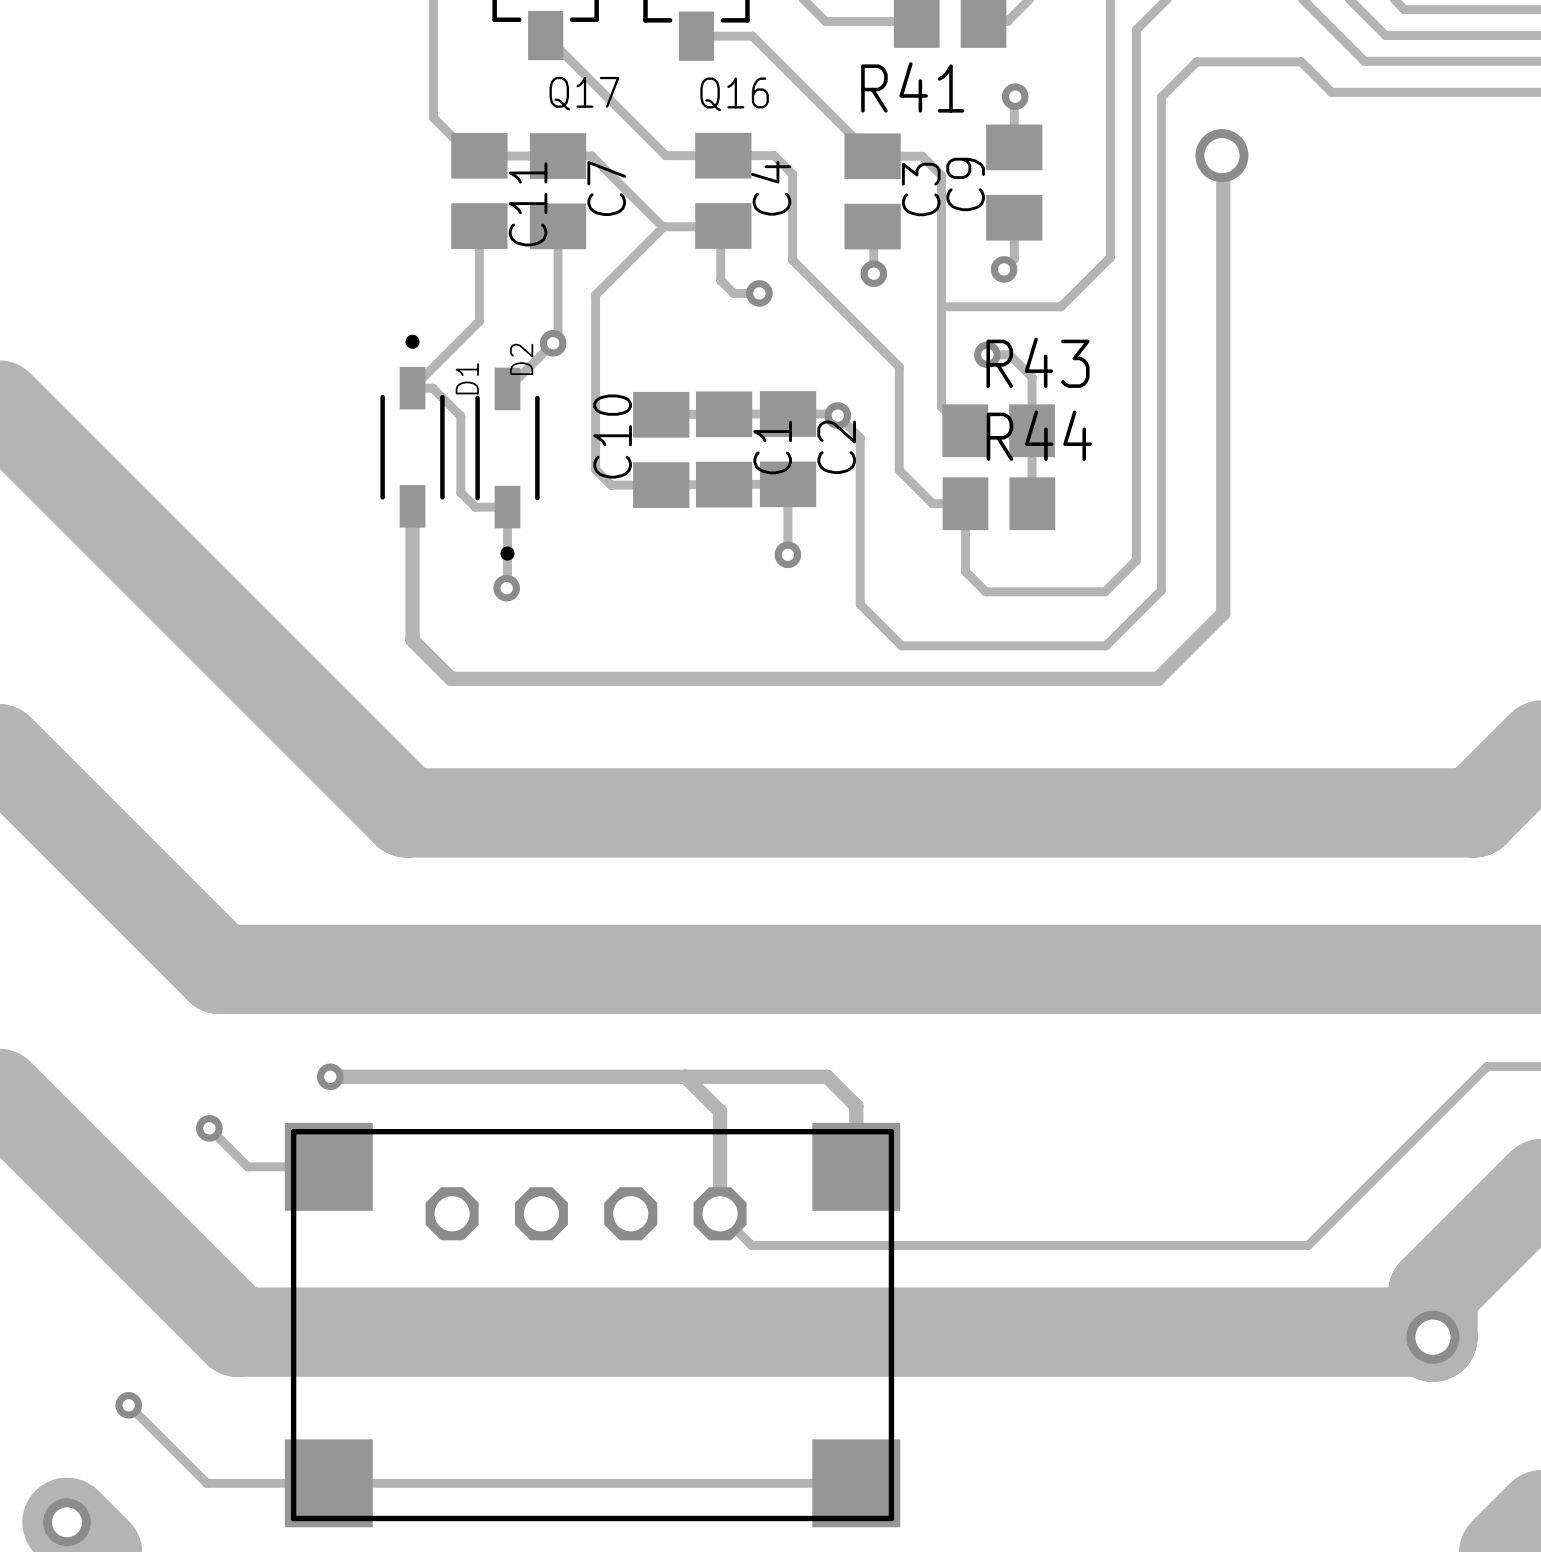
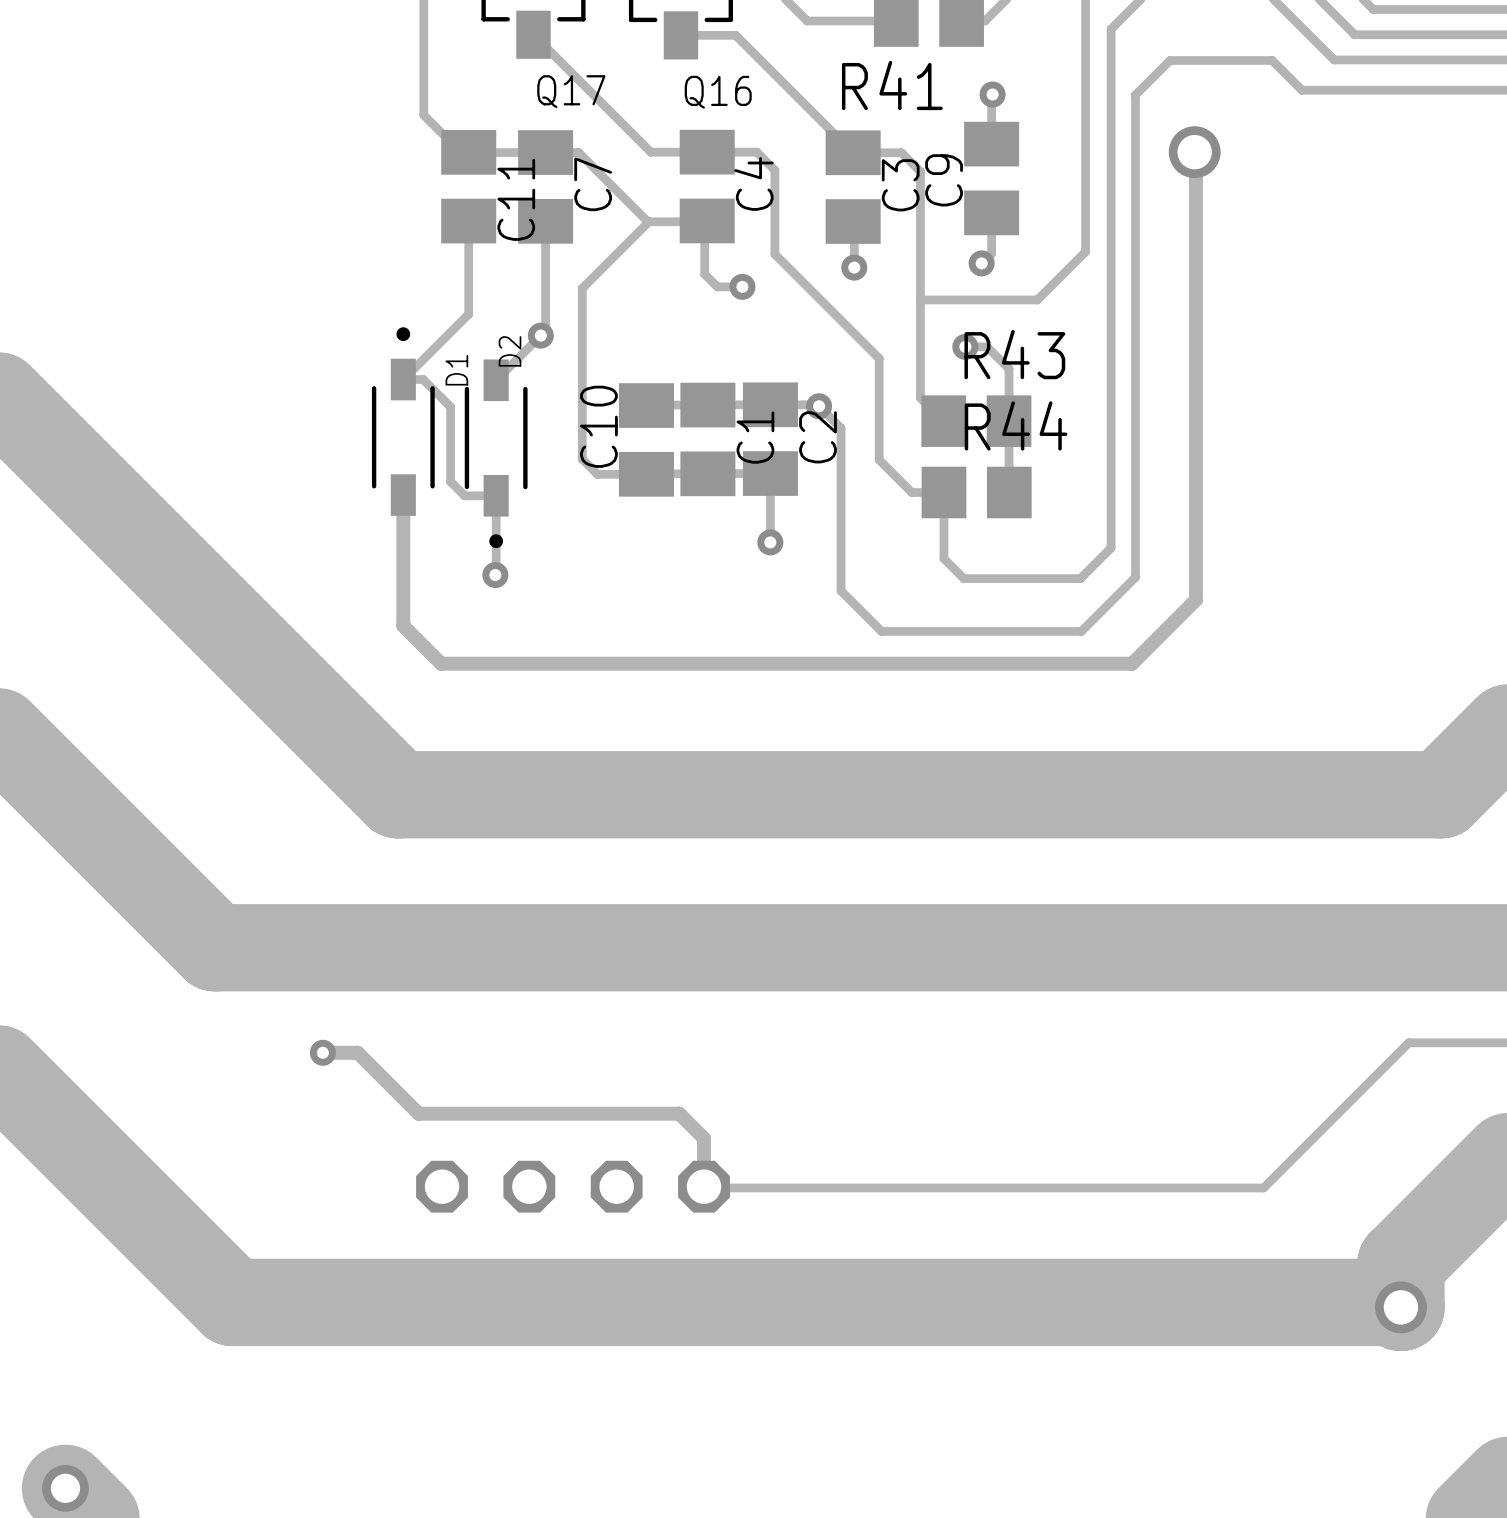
track: (1487, 1066) (1308, 1245) (751, 1245) (721, 1215) -> (1453, 1042) (1408, 1042) (1263, 1187) (705, 1187)
track: (365, 1076) (827, 1076) (856, 1105) (856, 1166) -> (357, 1052) (418, 1113) (679, 1113) (704, 1138)
track: (685, 1076) (720, 1111) (720, 1164) -> none
track: (209, 1128) (247, 1166) (328, 1166) -> none
via: (209, 1128) -> none
part: (592, 1325) -> none
track: (128, 1405) (206, 1483) (856, 1483) -> none
via: (128, 1405) -> none

